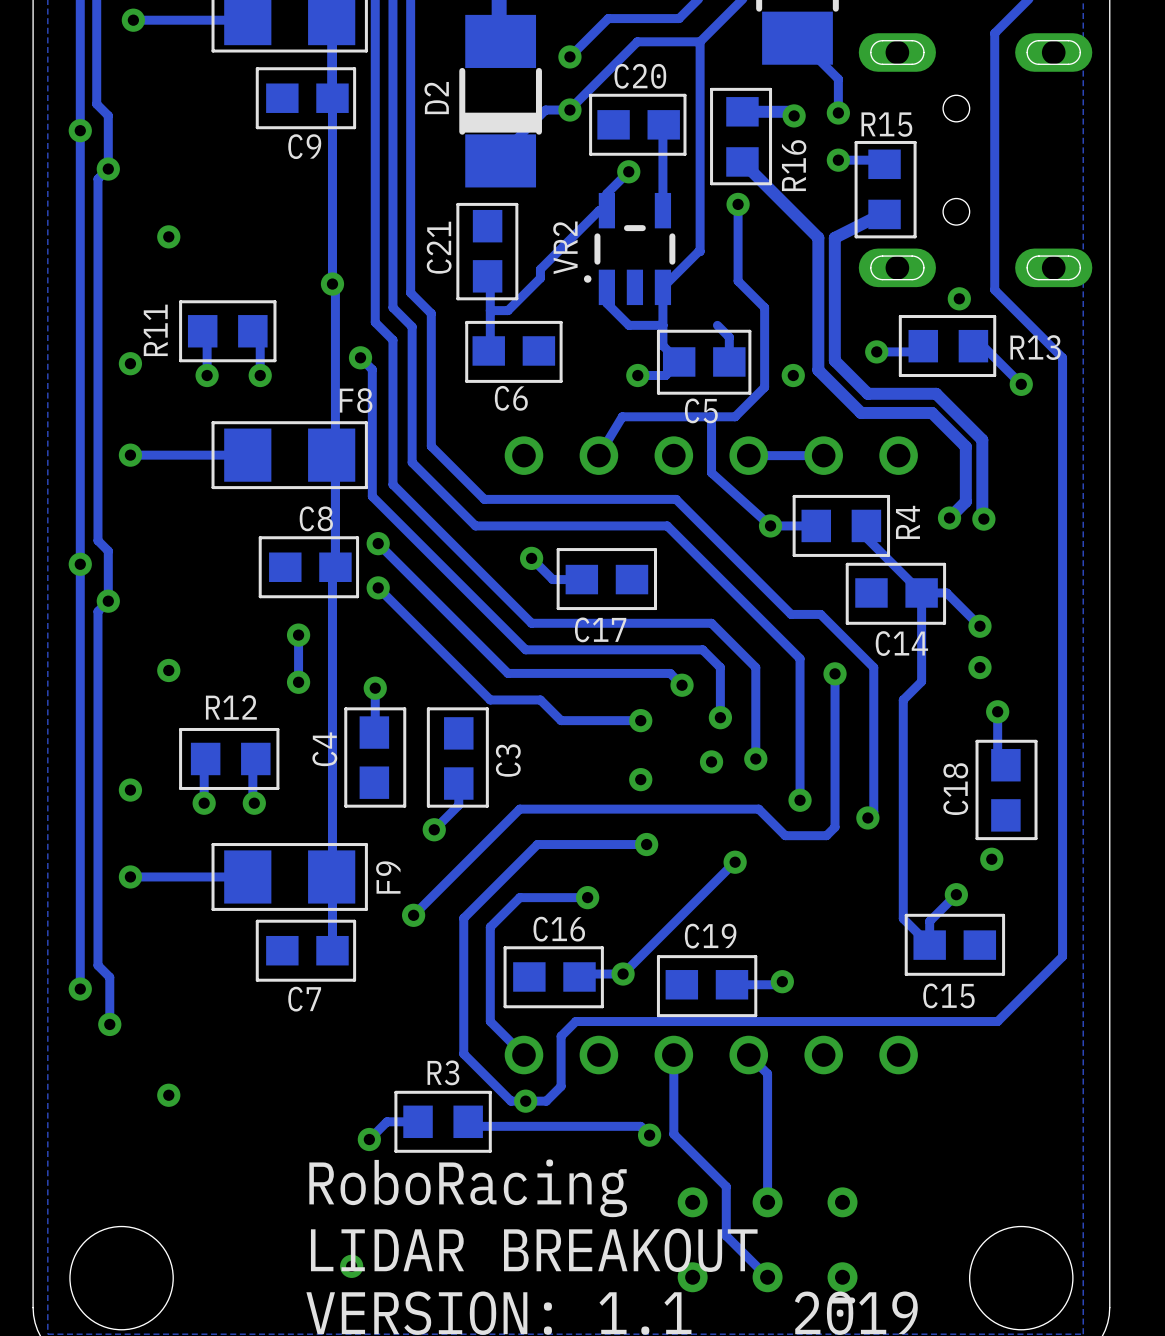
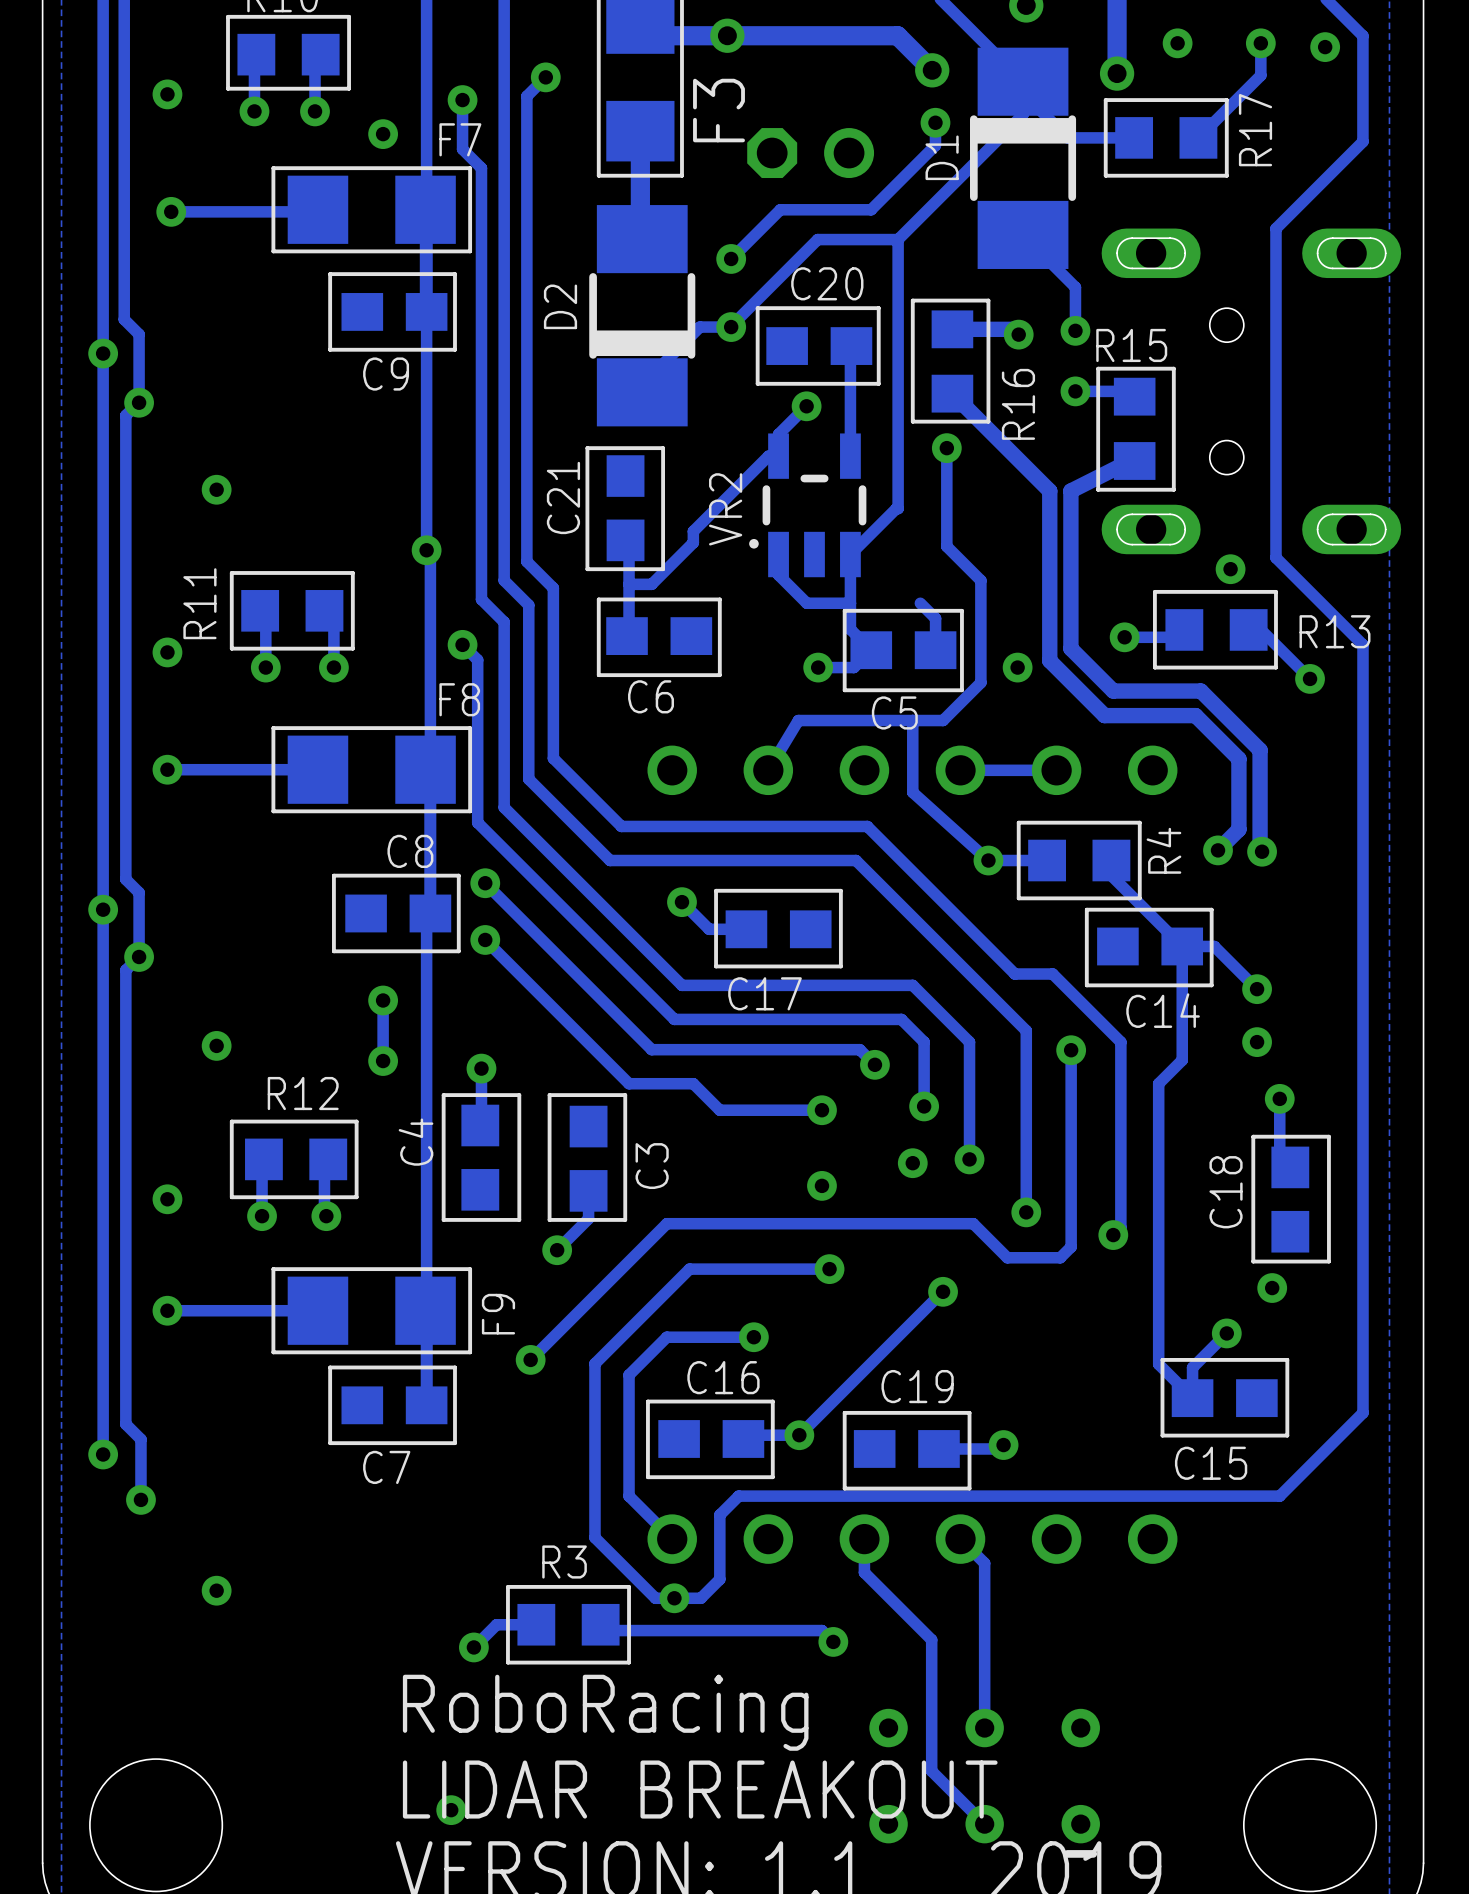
track: (673, 1081) (673, 1134) (726, 1186) -> (864, 1572) (931, 1639) (931, 1707)

